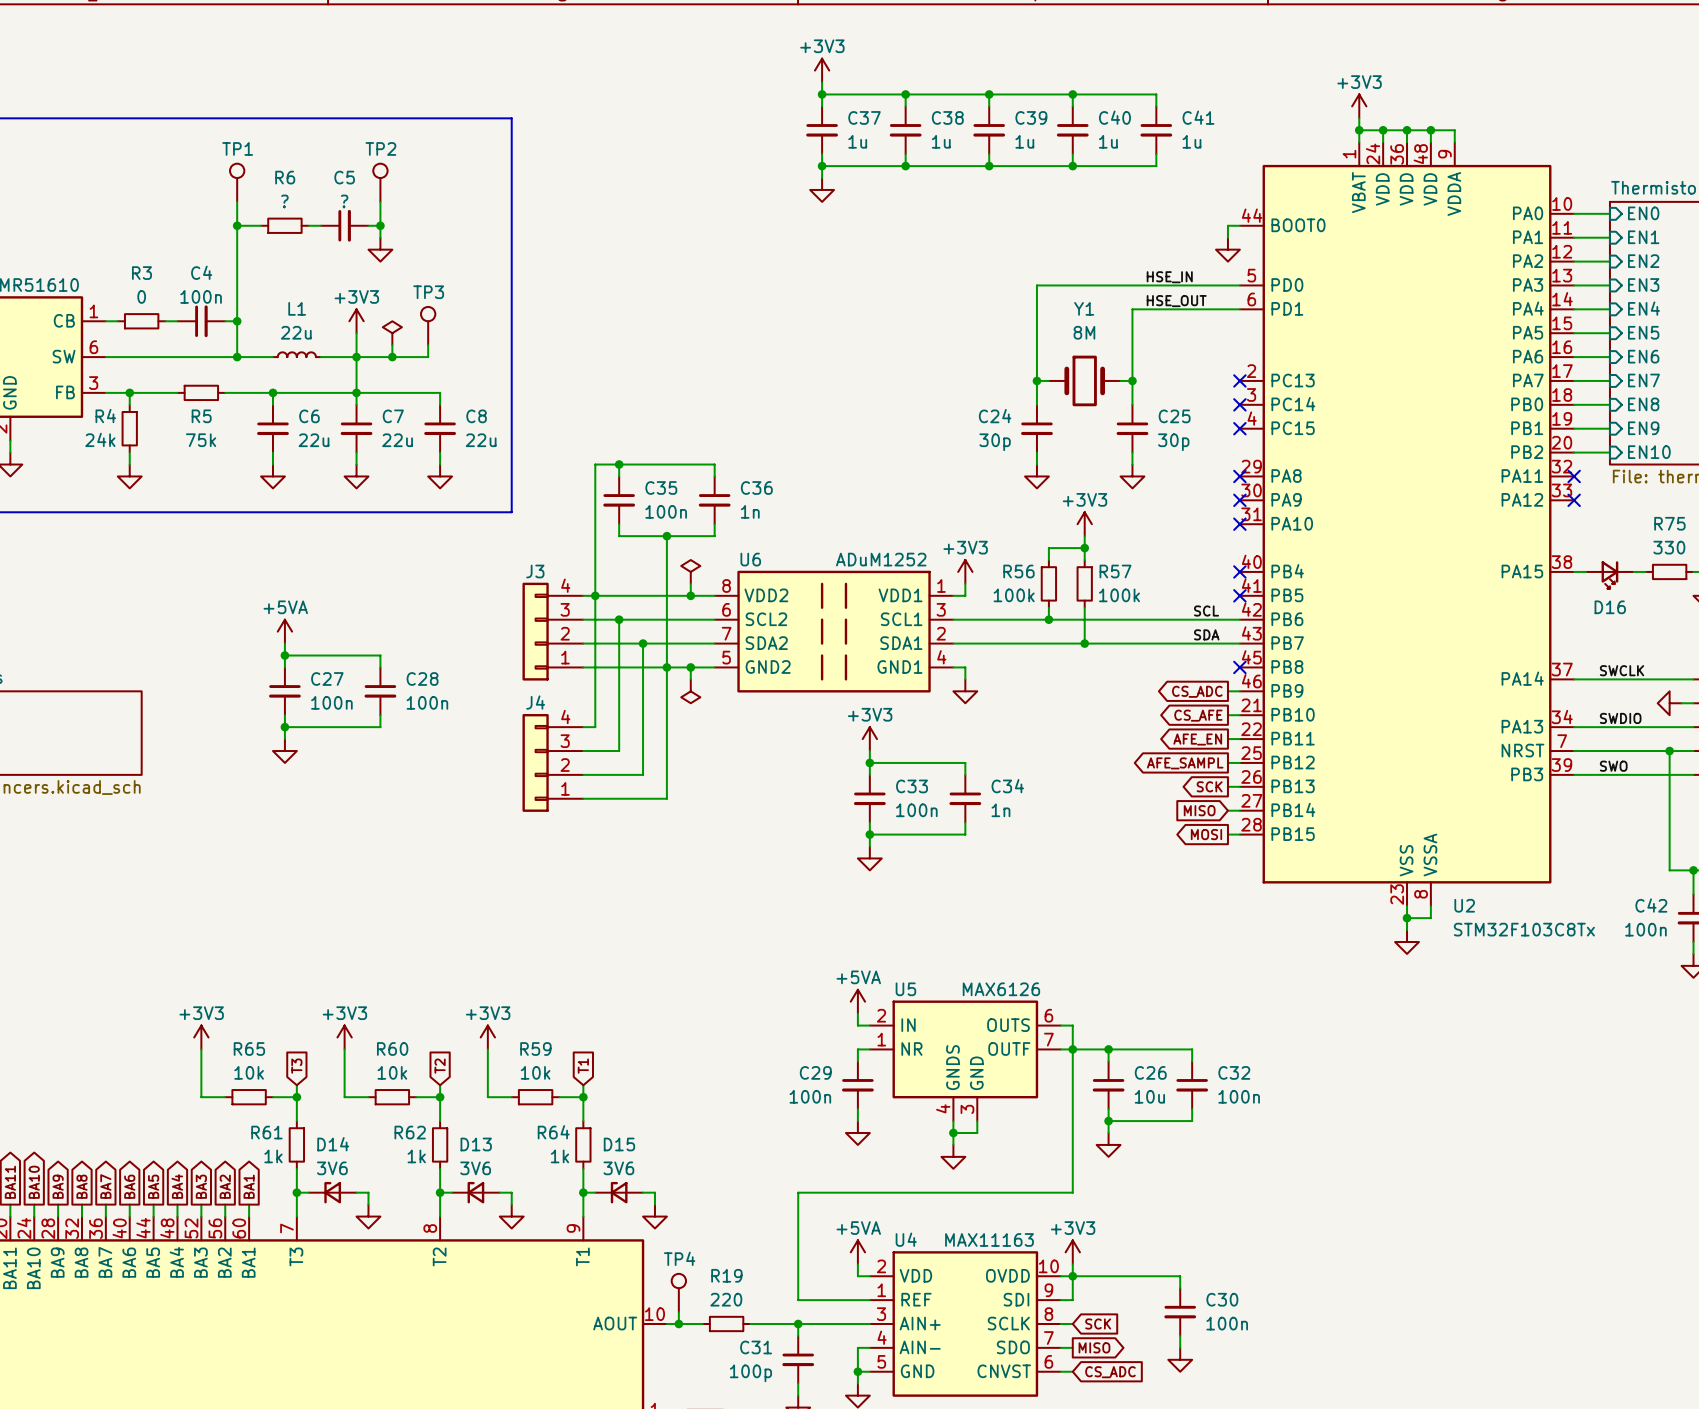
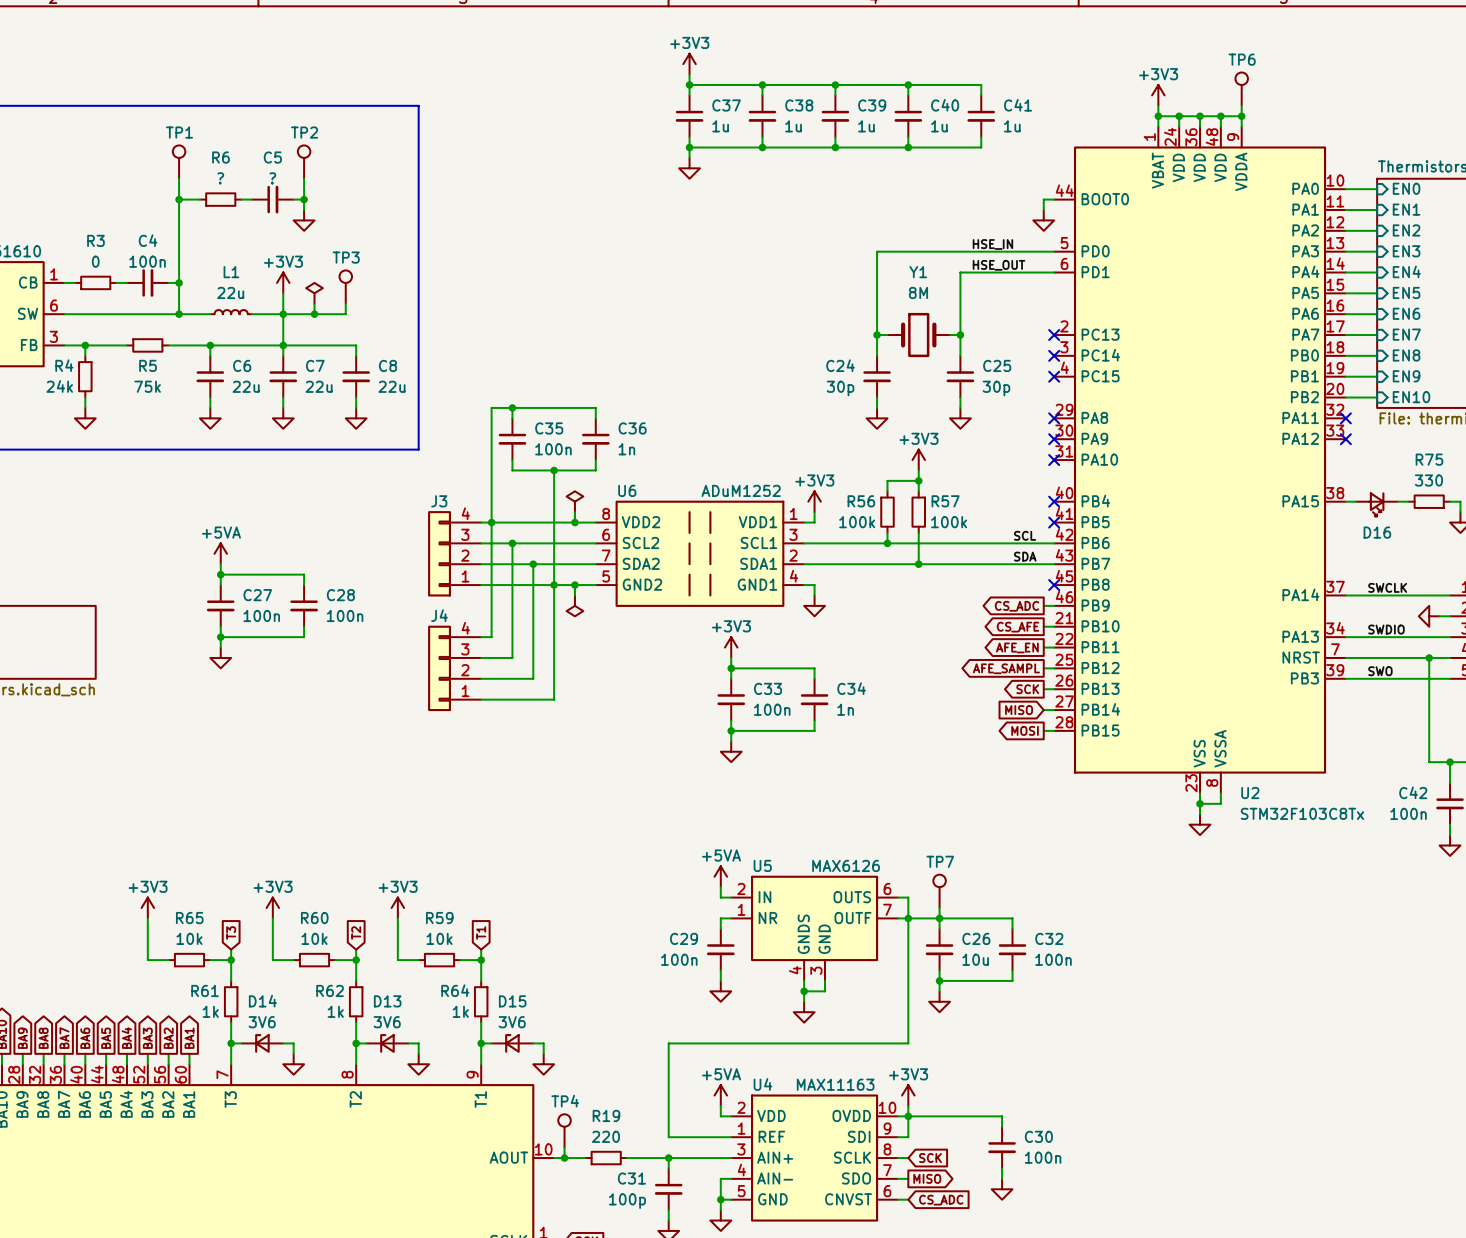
TP6: none -> (1241, 89)
wire: none -> (1241, 105) (1241, 116)
junction: none -> (1241, 116)
TP7: none -> (939, 891)
wire: none -> (939, 908) (939, 918)

